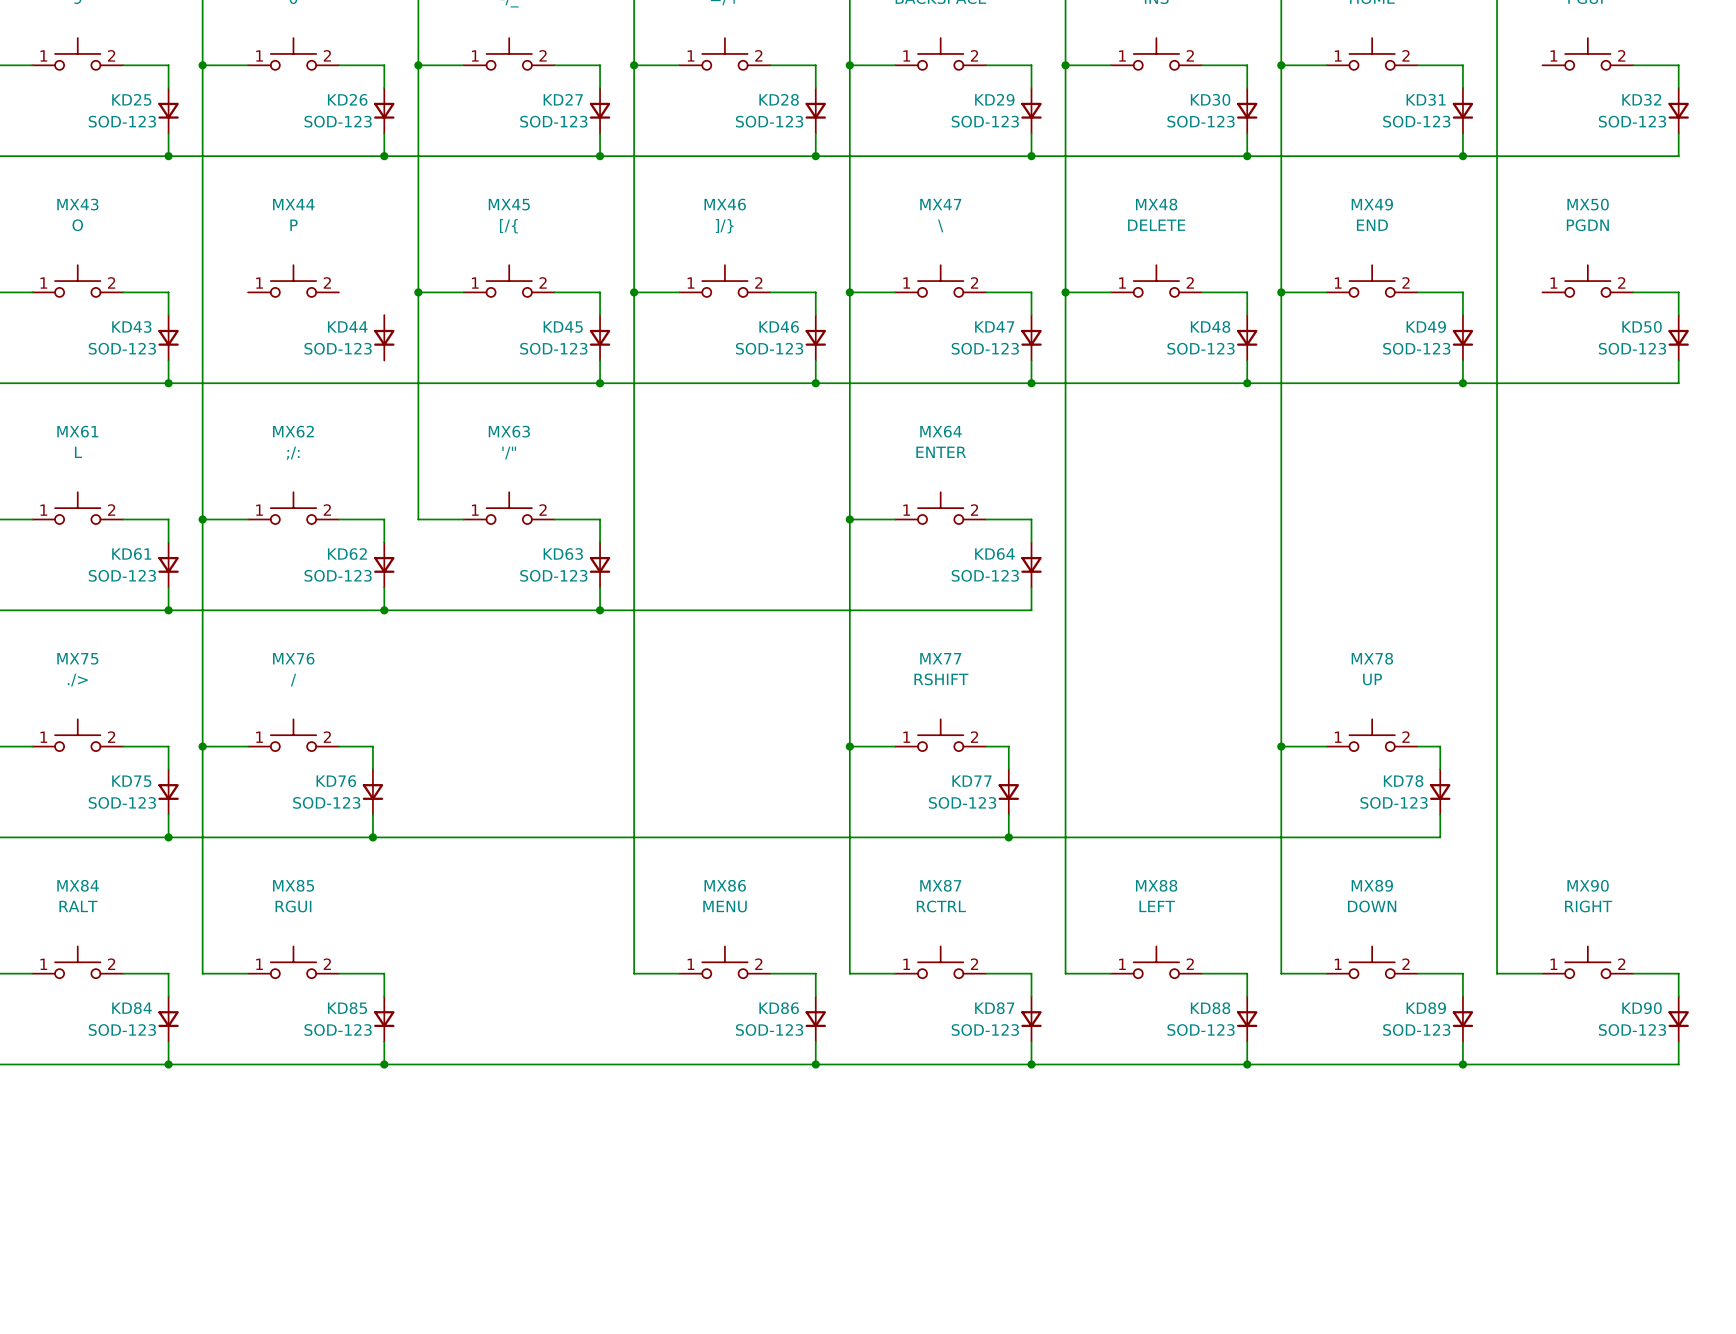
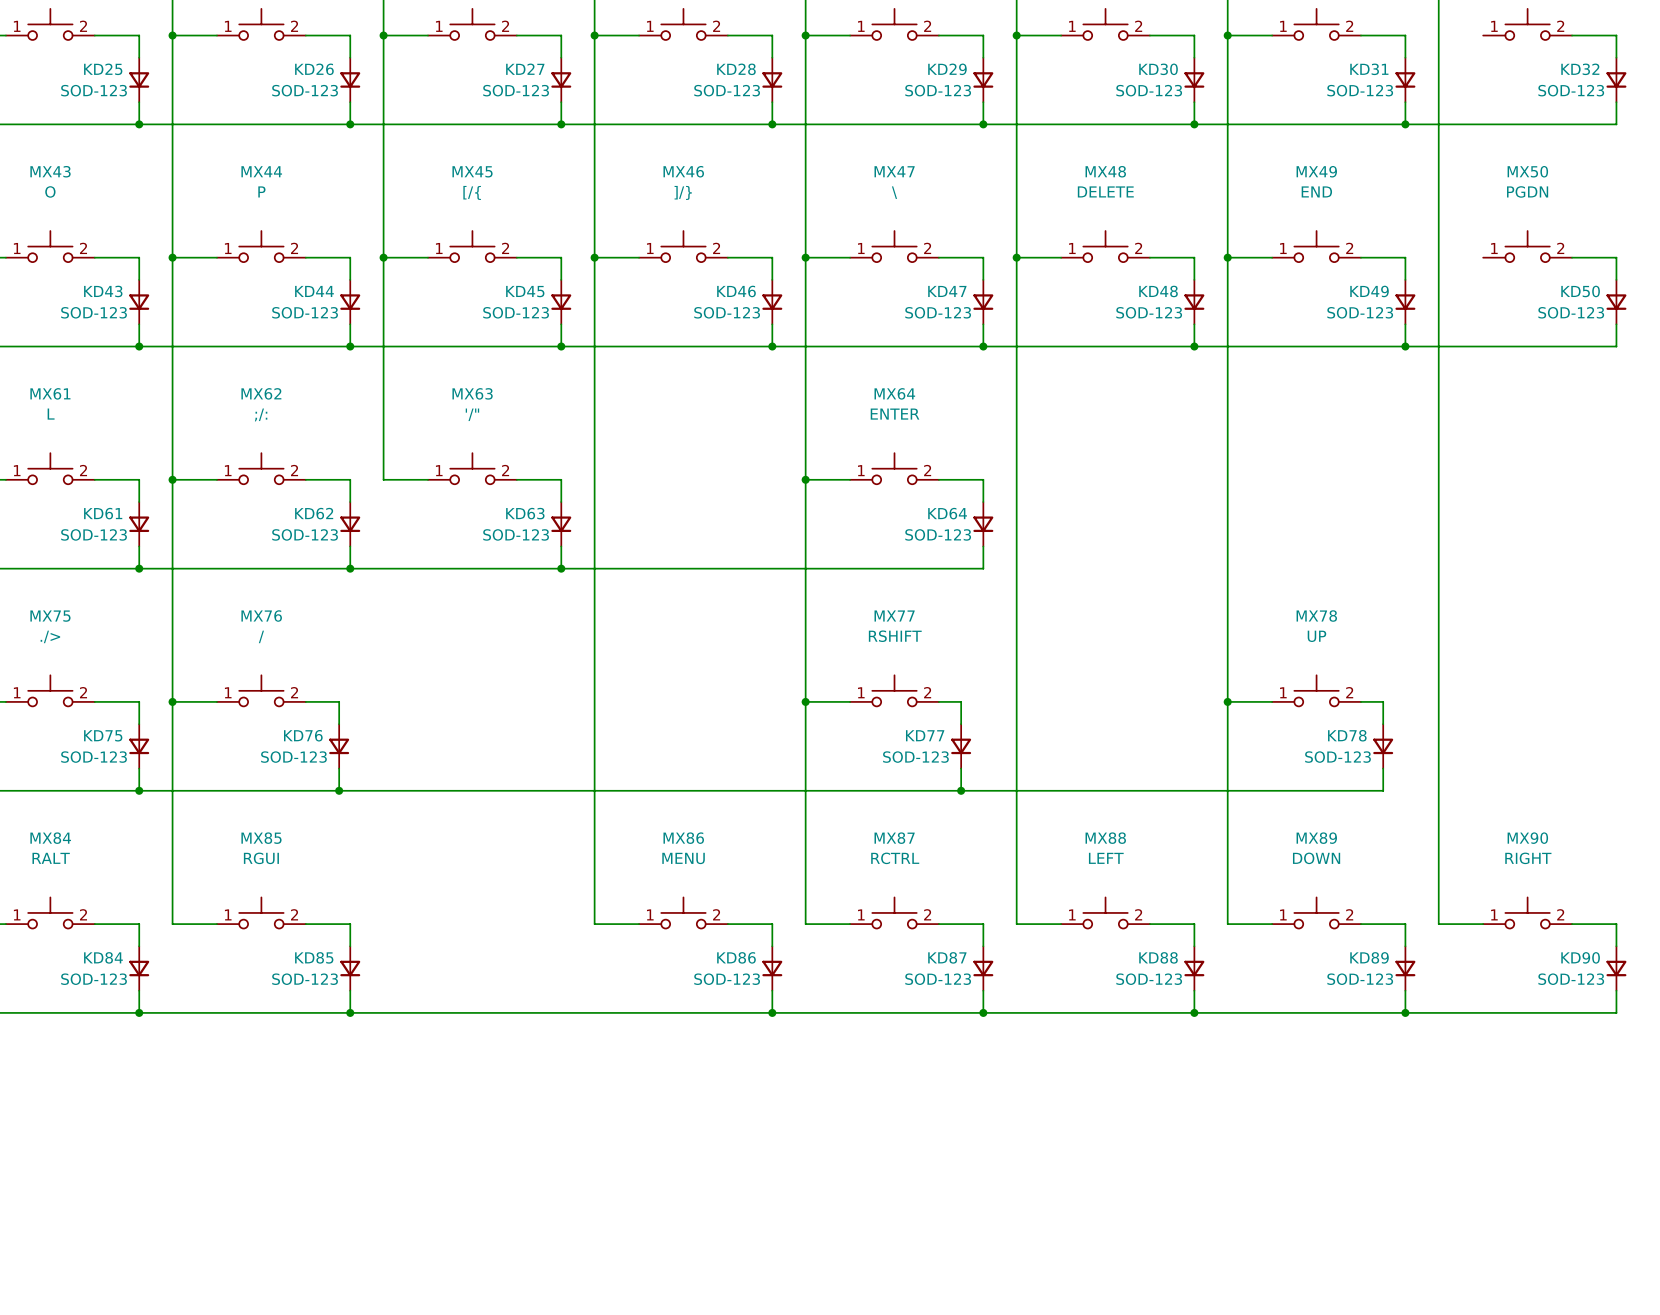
wire: none -> (172, 257) (216, 257)
junction: none -> (172, 257)
wire: none -> (305, 257) (350, 257) (350, 279)
wire: none -> (350, 324) (350, 346)
junction: none -> (350, 346)

